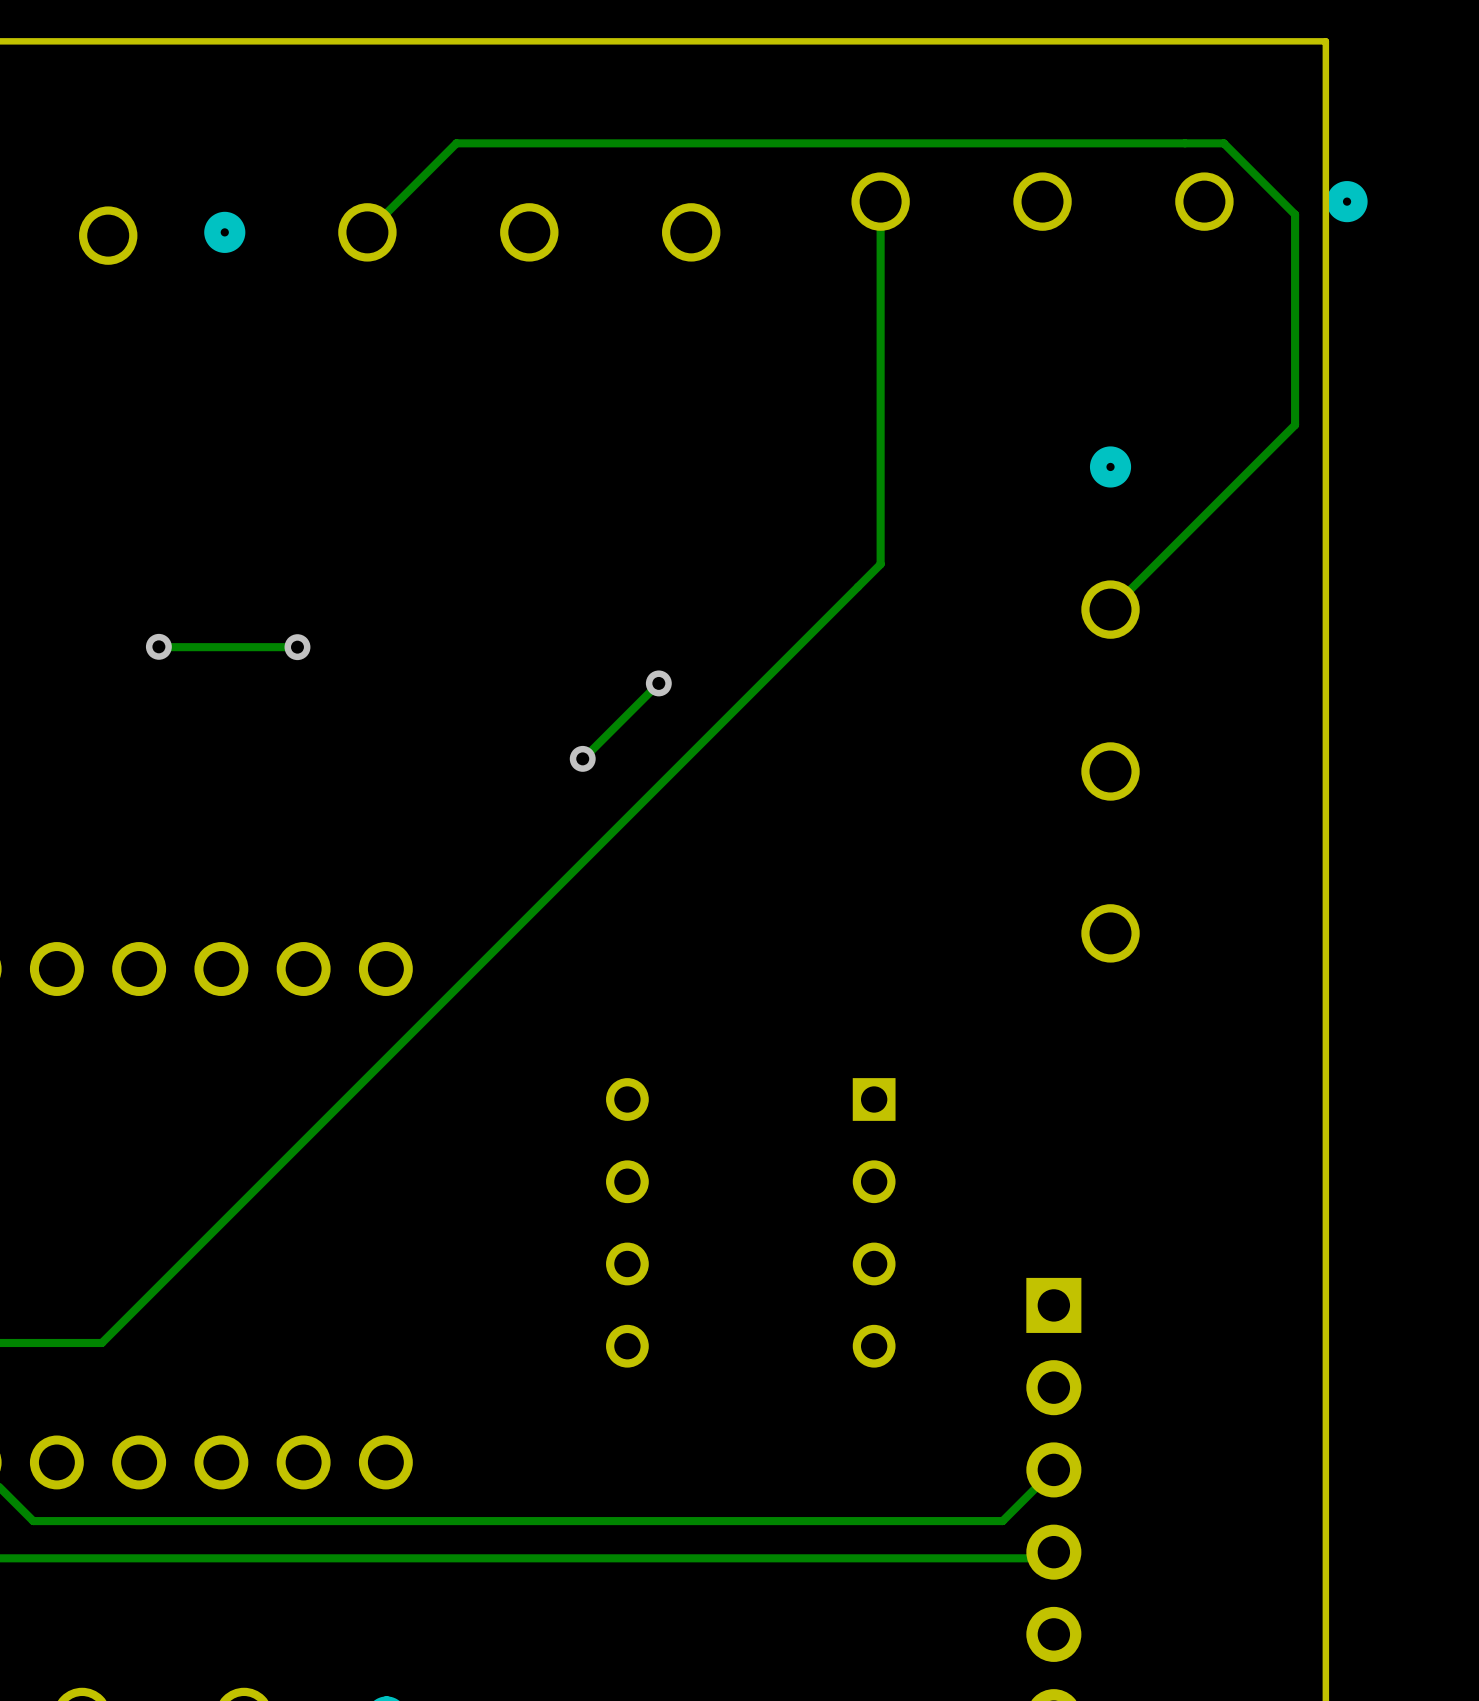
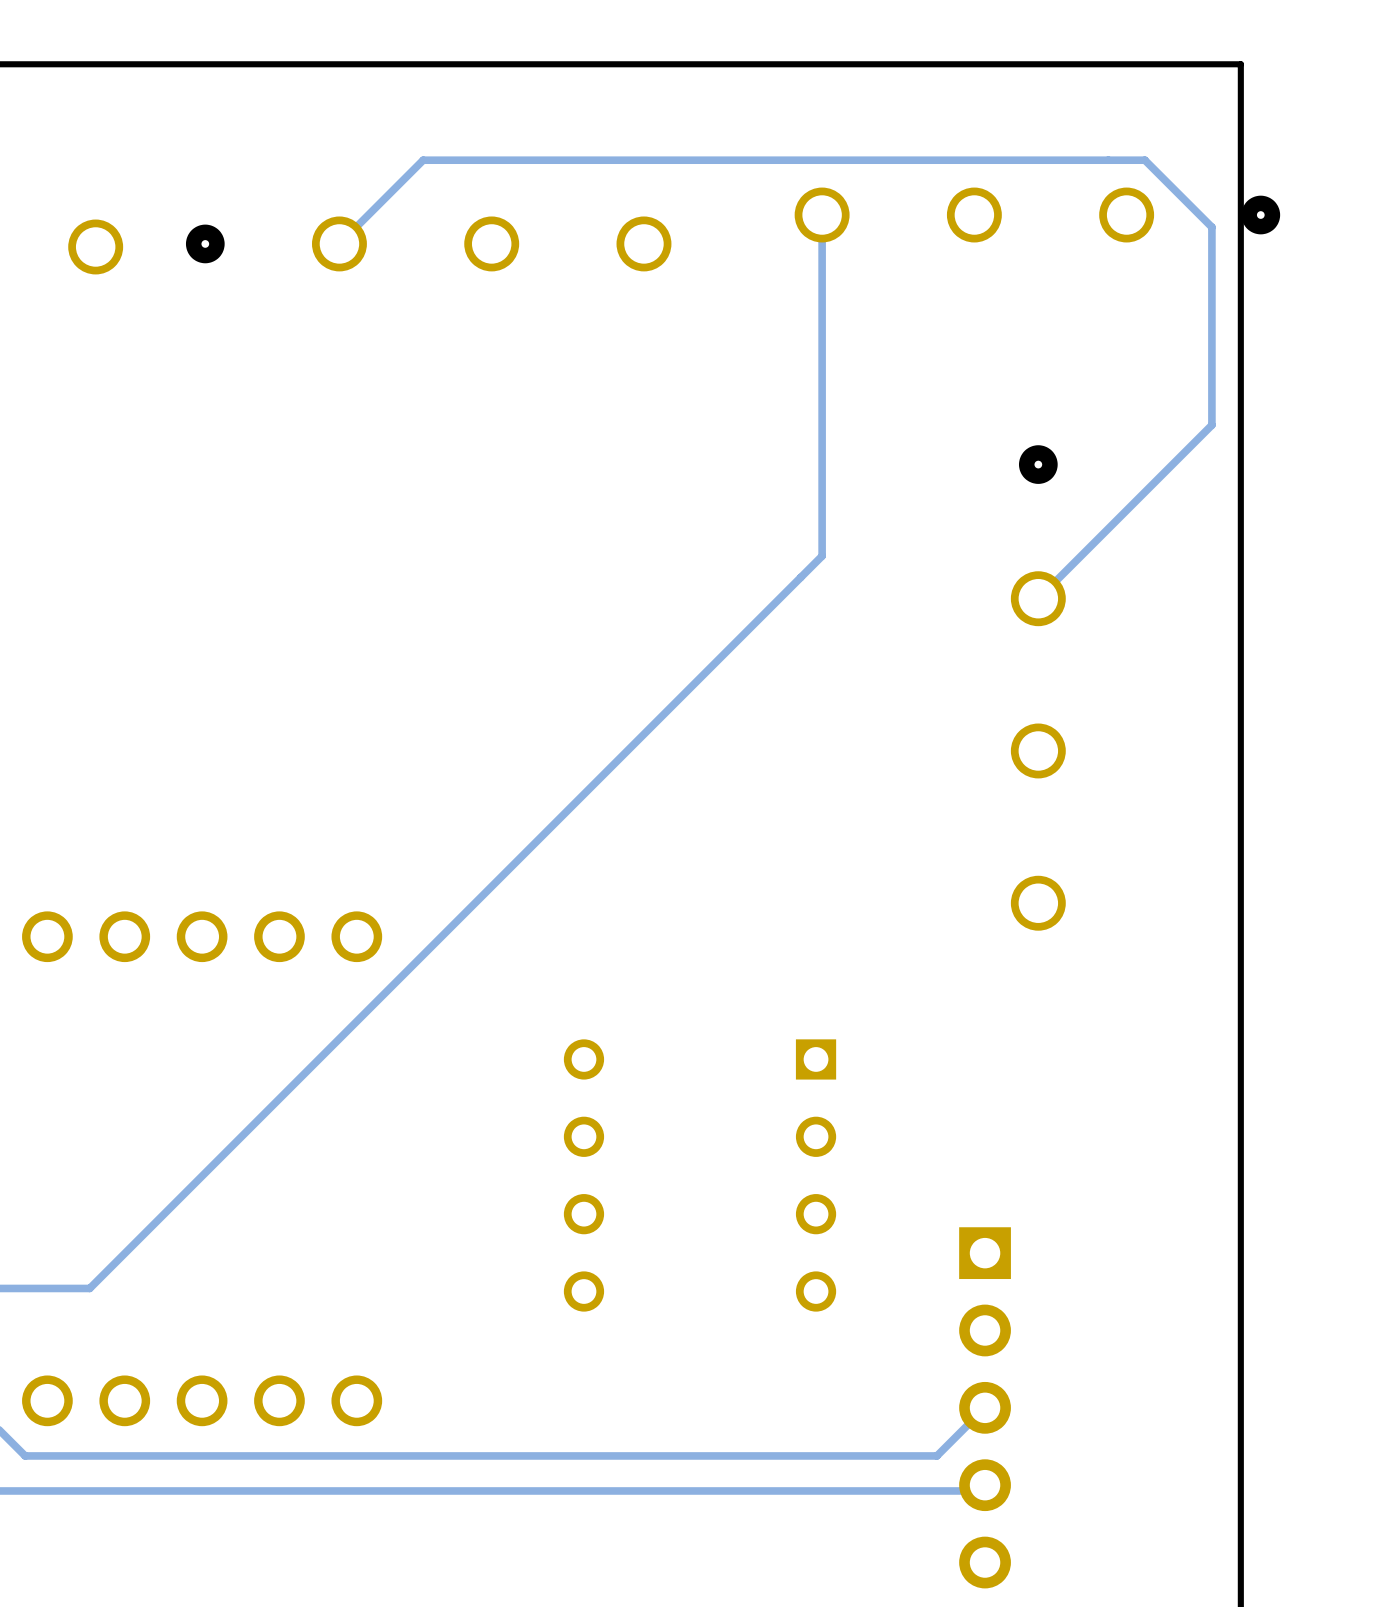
via: (158, 646) -> none
track: (297, 647) (159, 647) -> none
via: (297, 647) -> none
track: (658, 683) (583, 758) -> none
via: (658, 683) -> none
via: (582, 758) -> none

